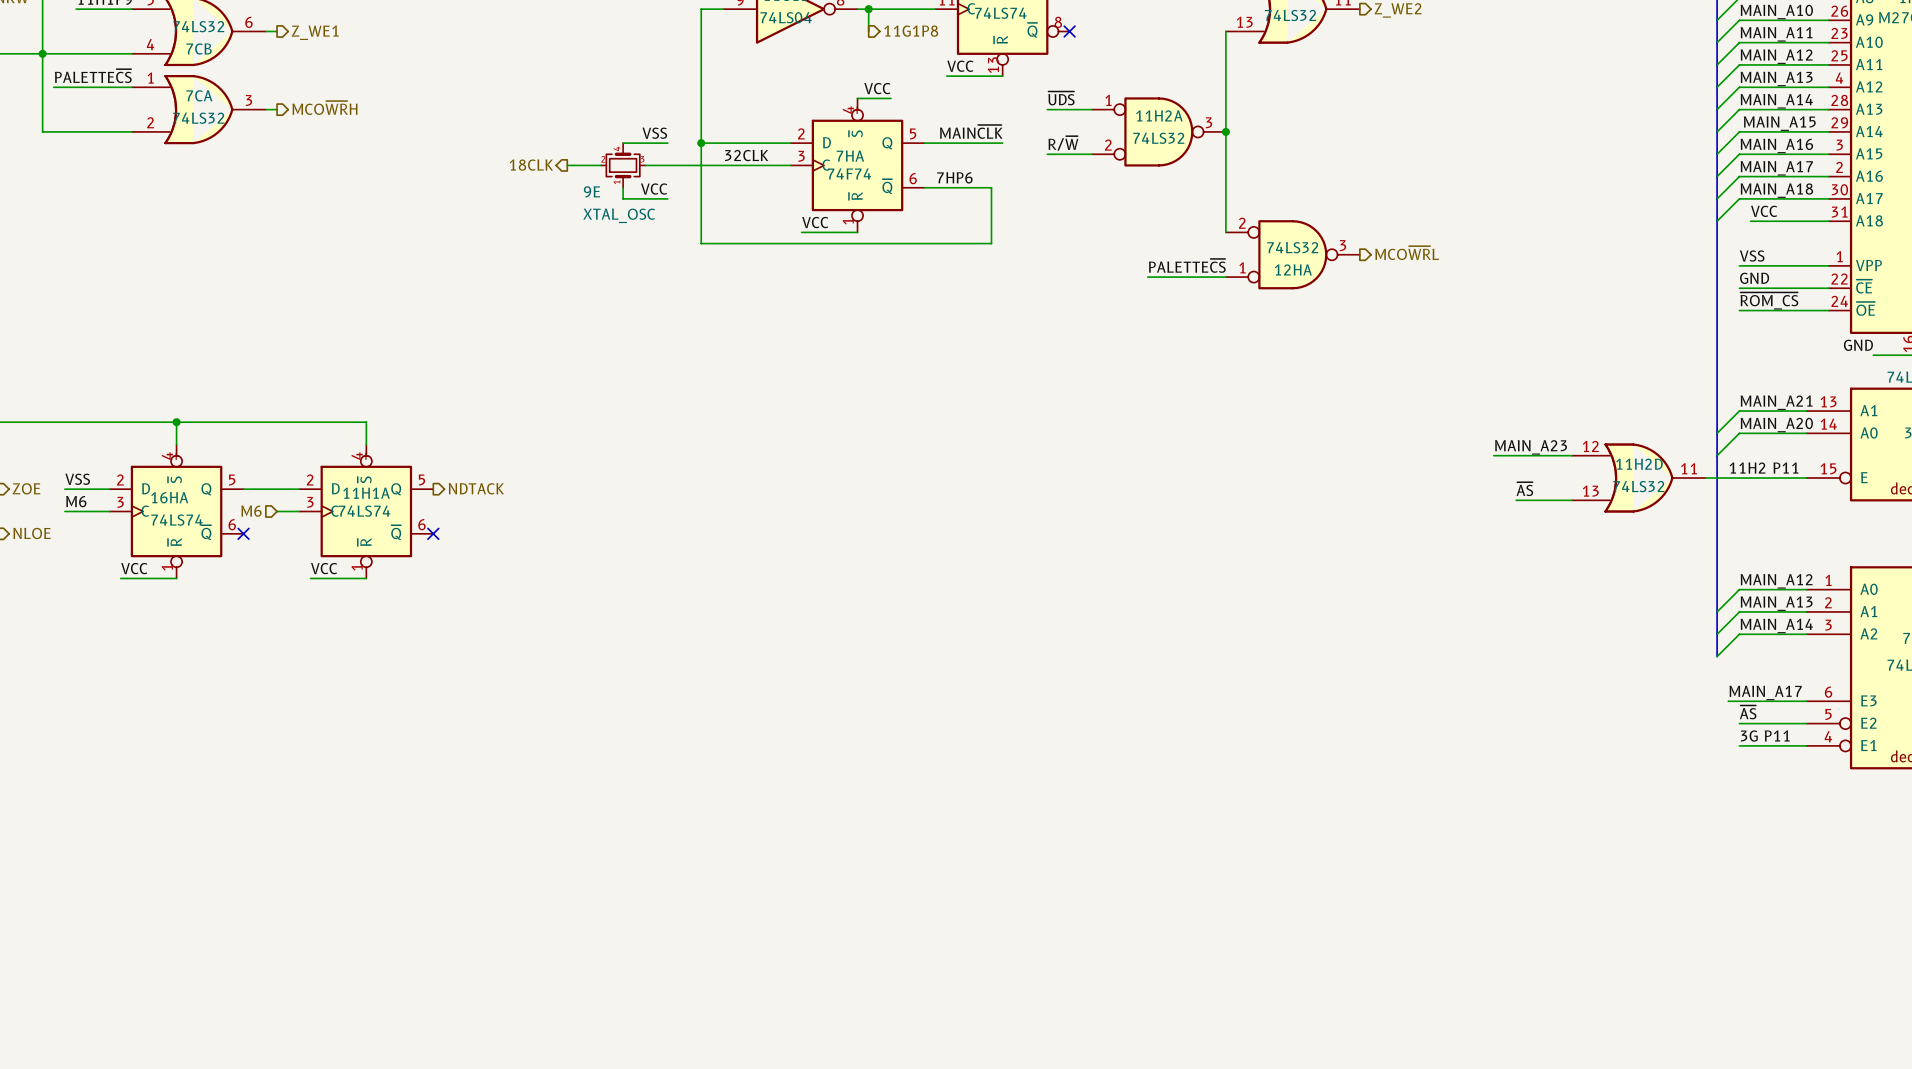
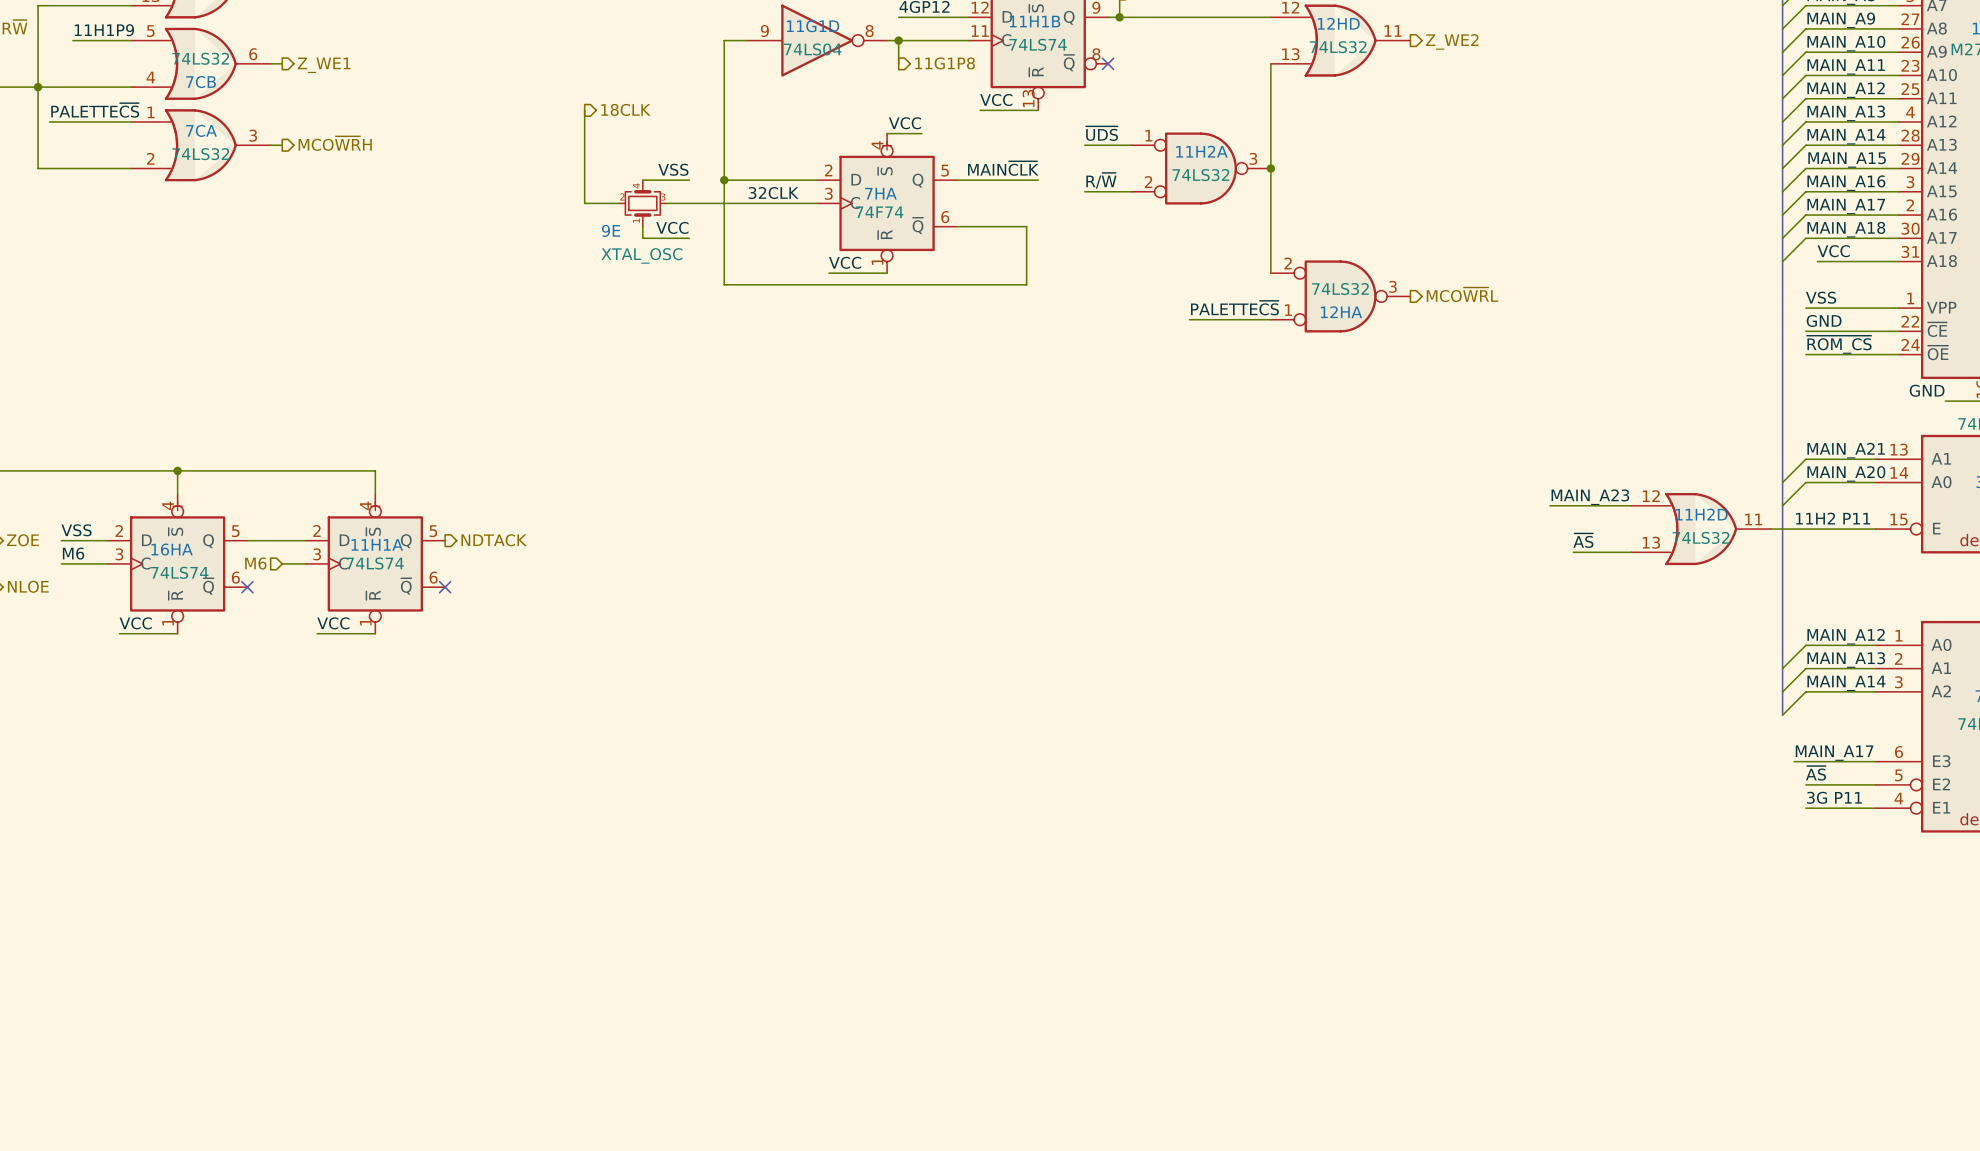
wire: none -> (584, 110) (584, 203)
hierarchical label rotation: 0° (531, 165) -> 180° (625, 109)
hierarchical label position: 18CLK (531, 165) -> 18CLK (625, 109)
label: 7HP6 (954, 177) -> none

